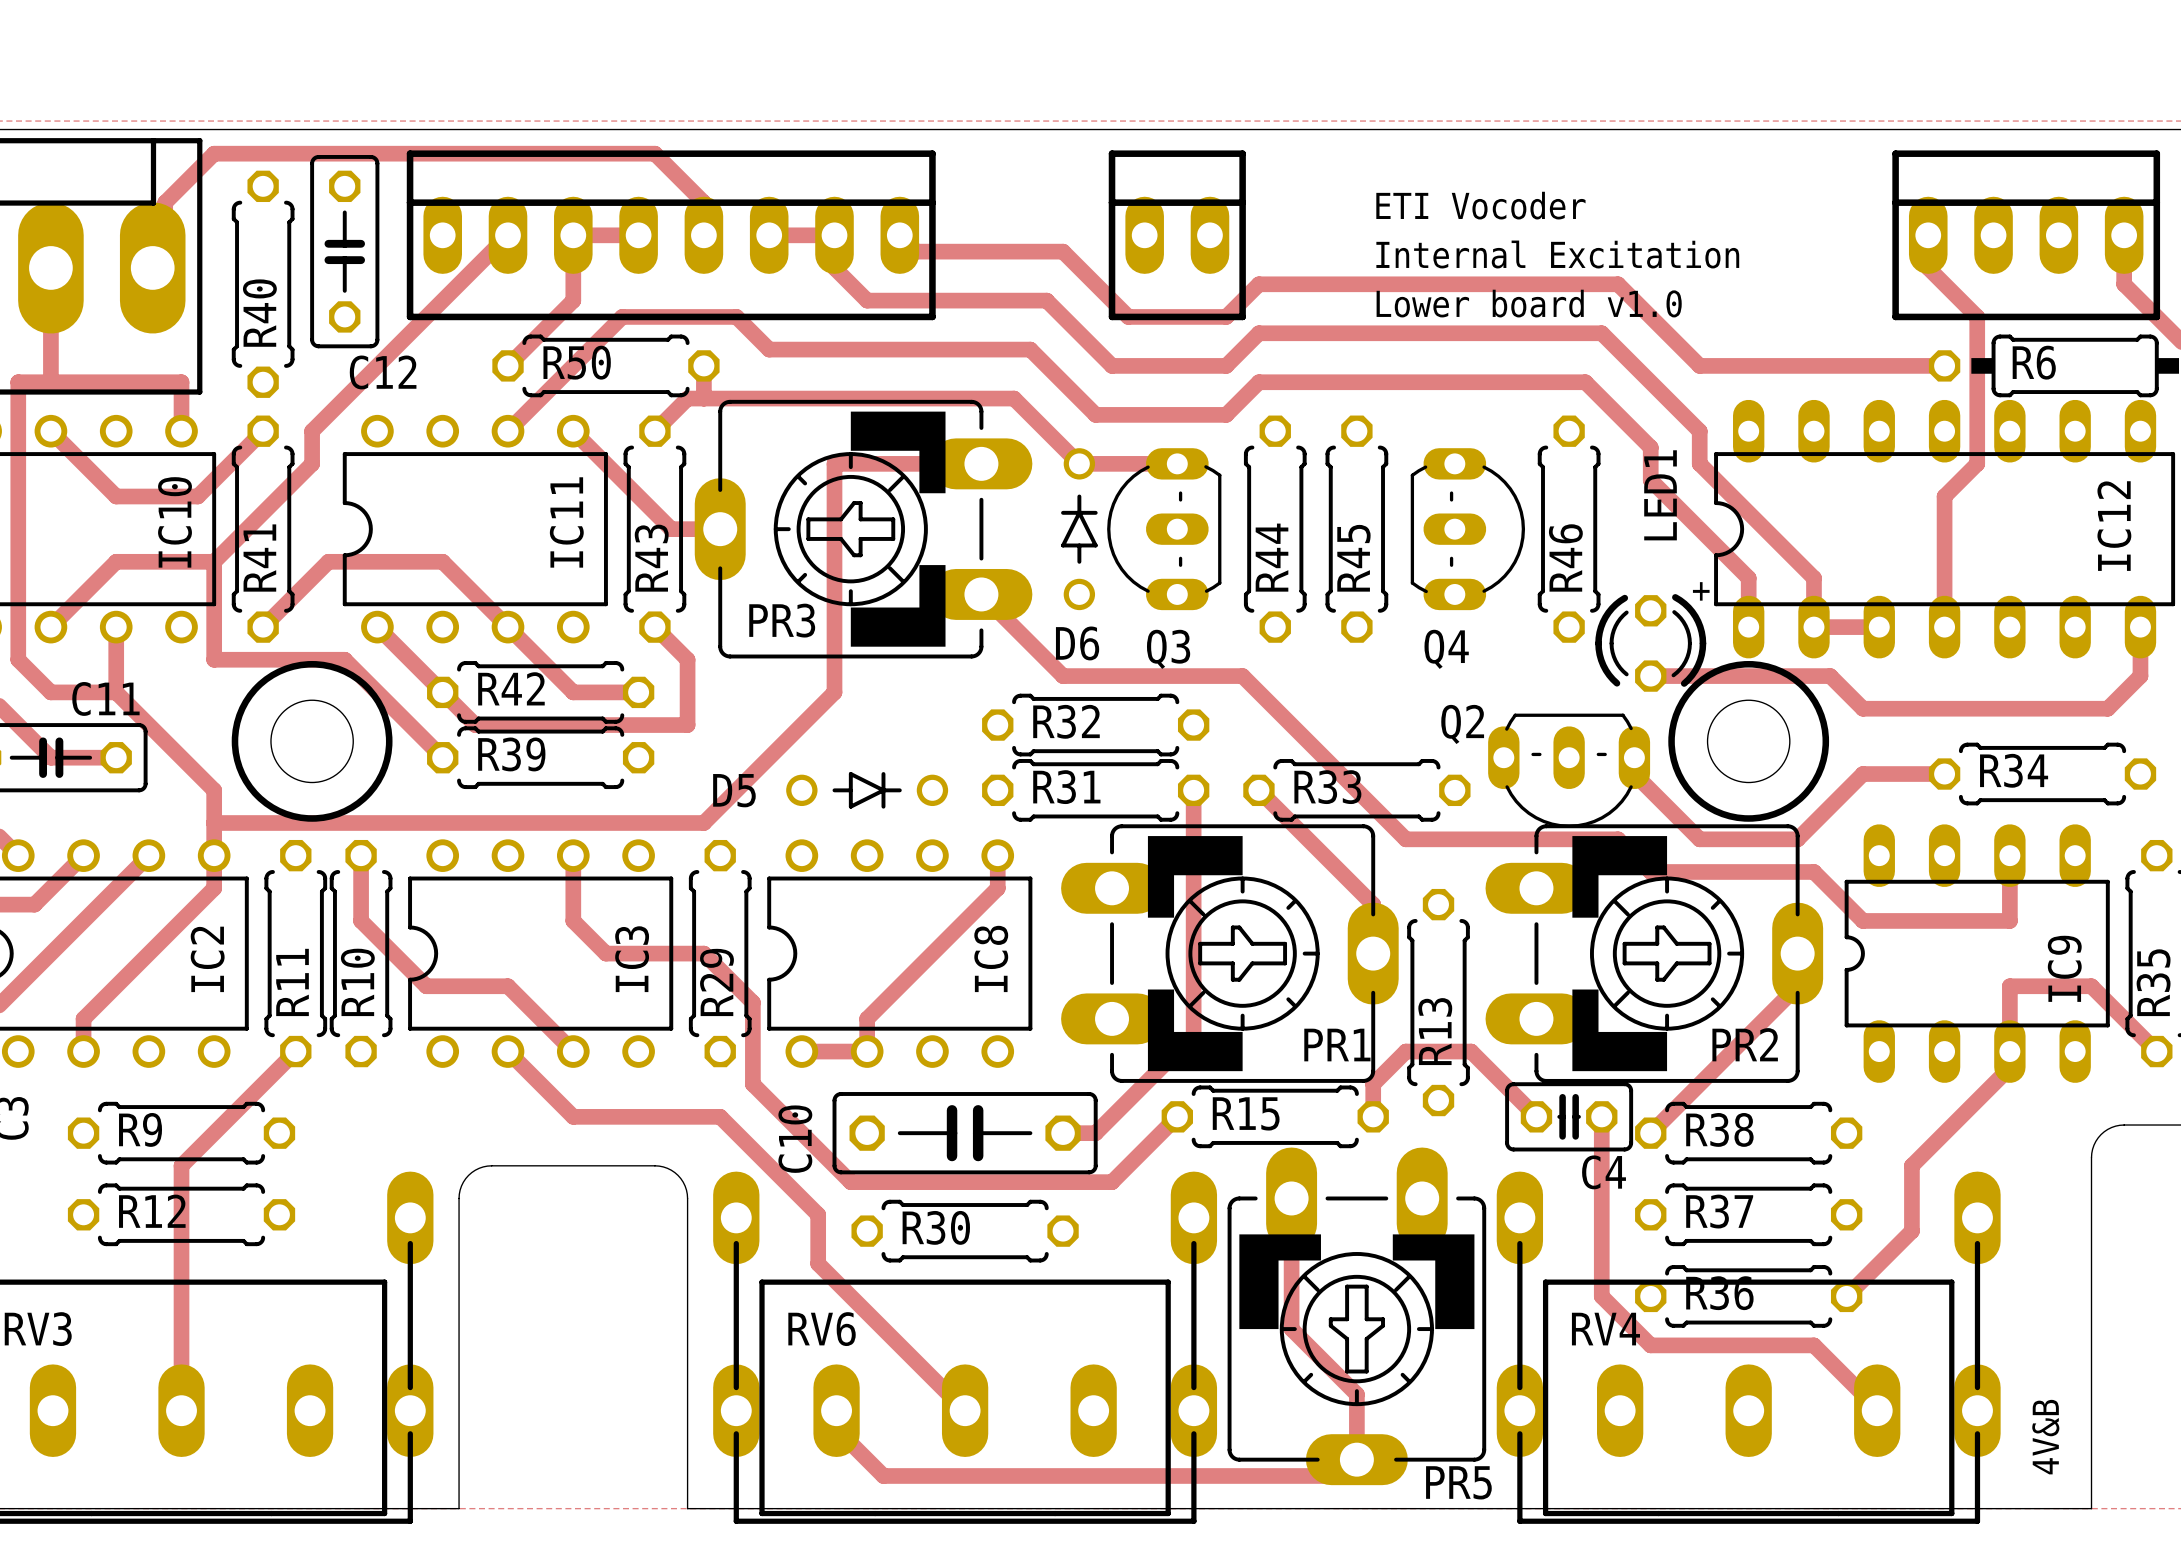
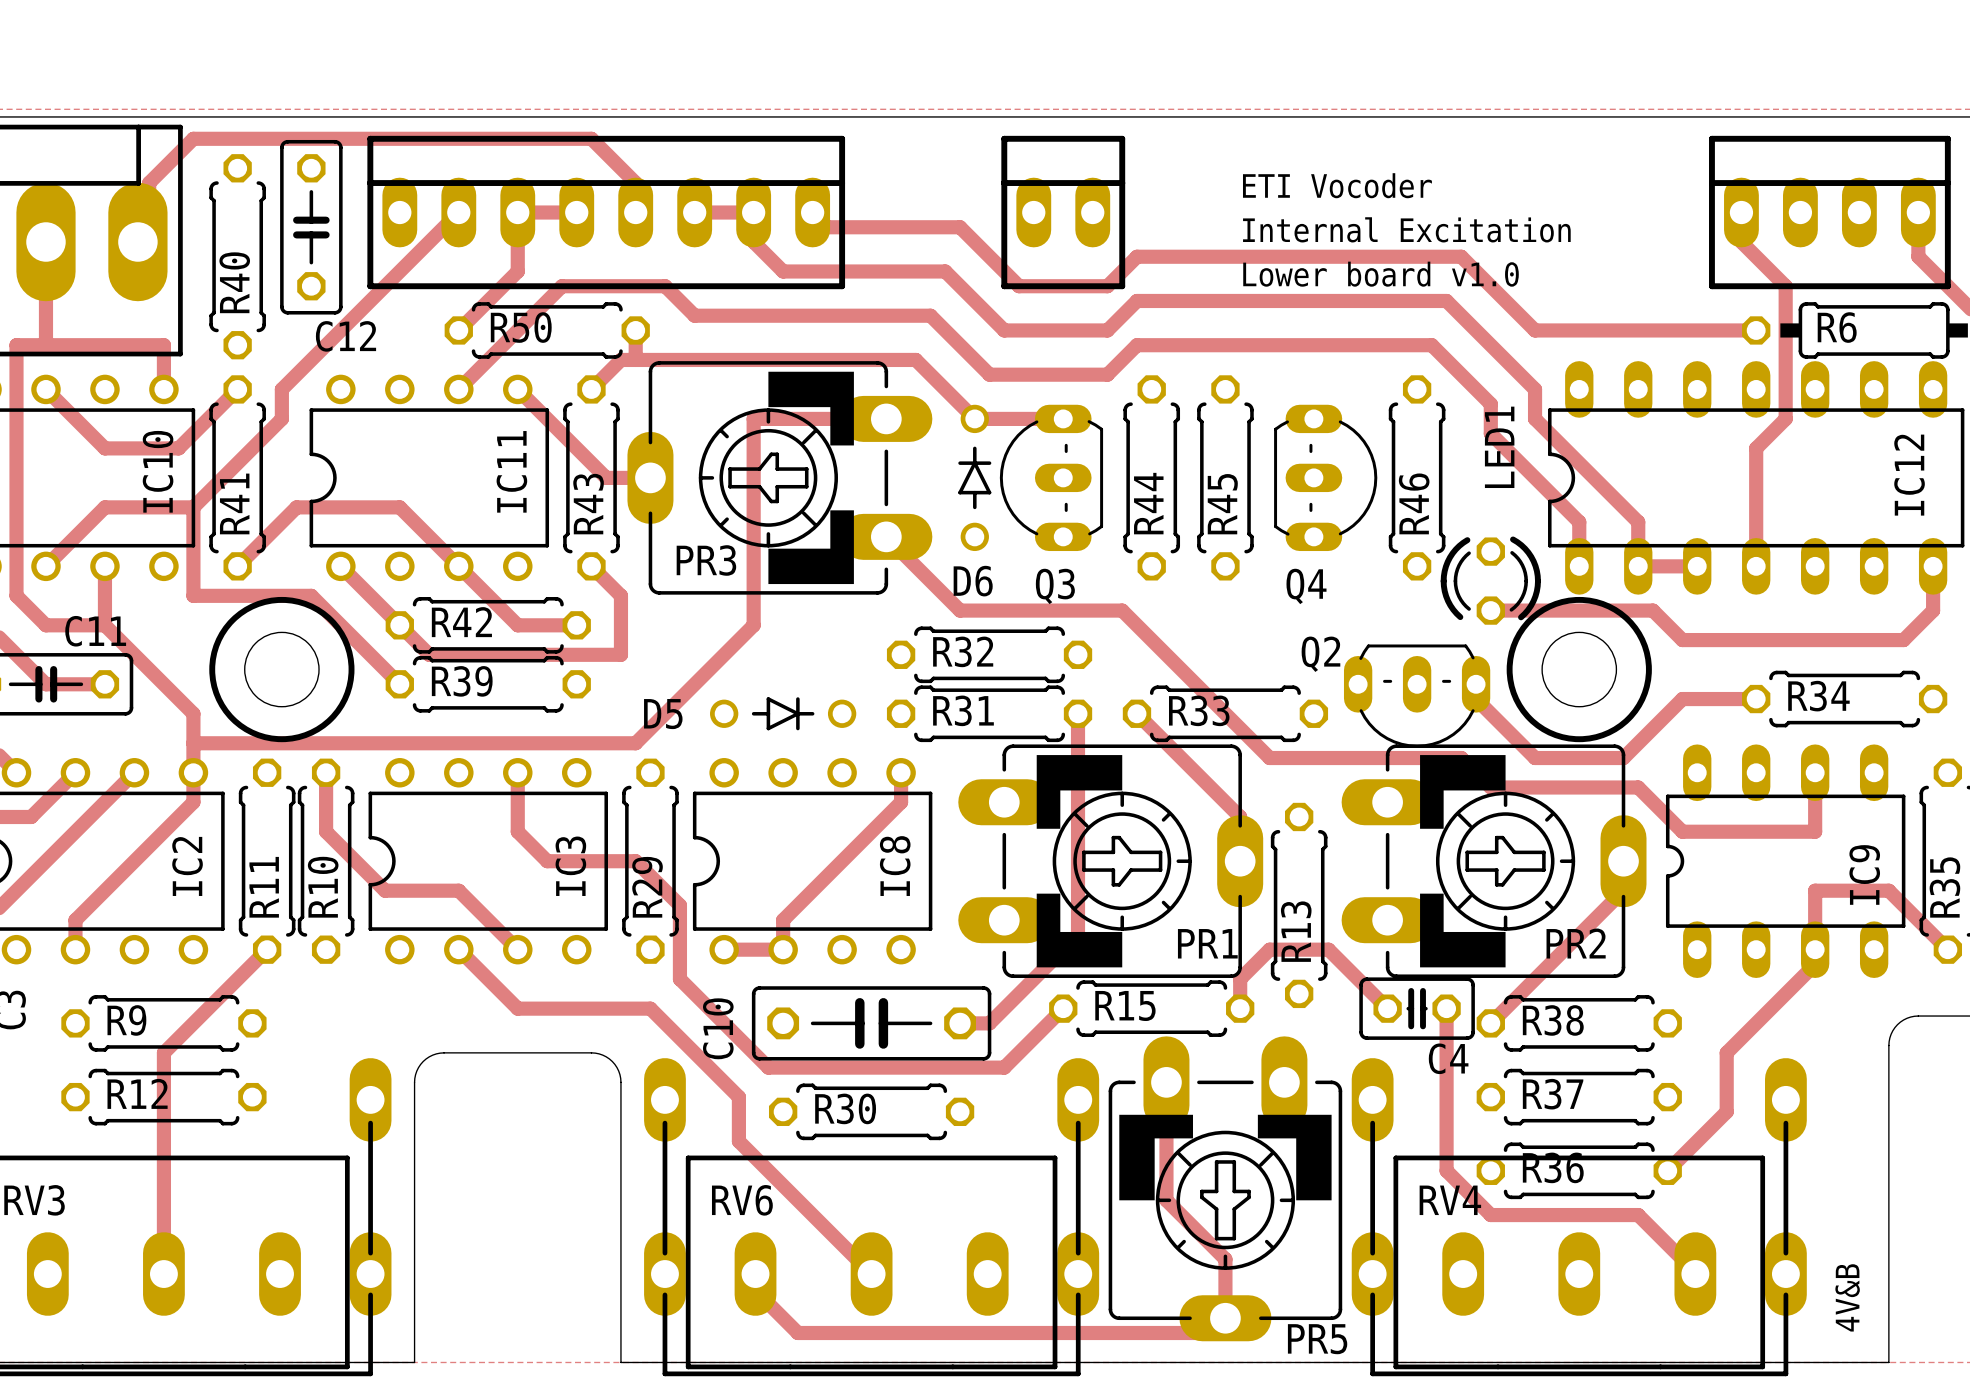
text: + (1701, 591) -> none

